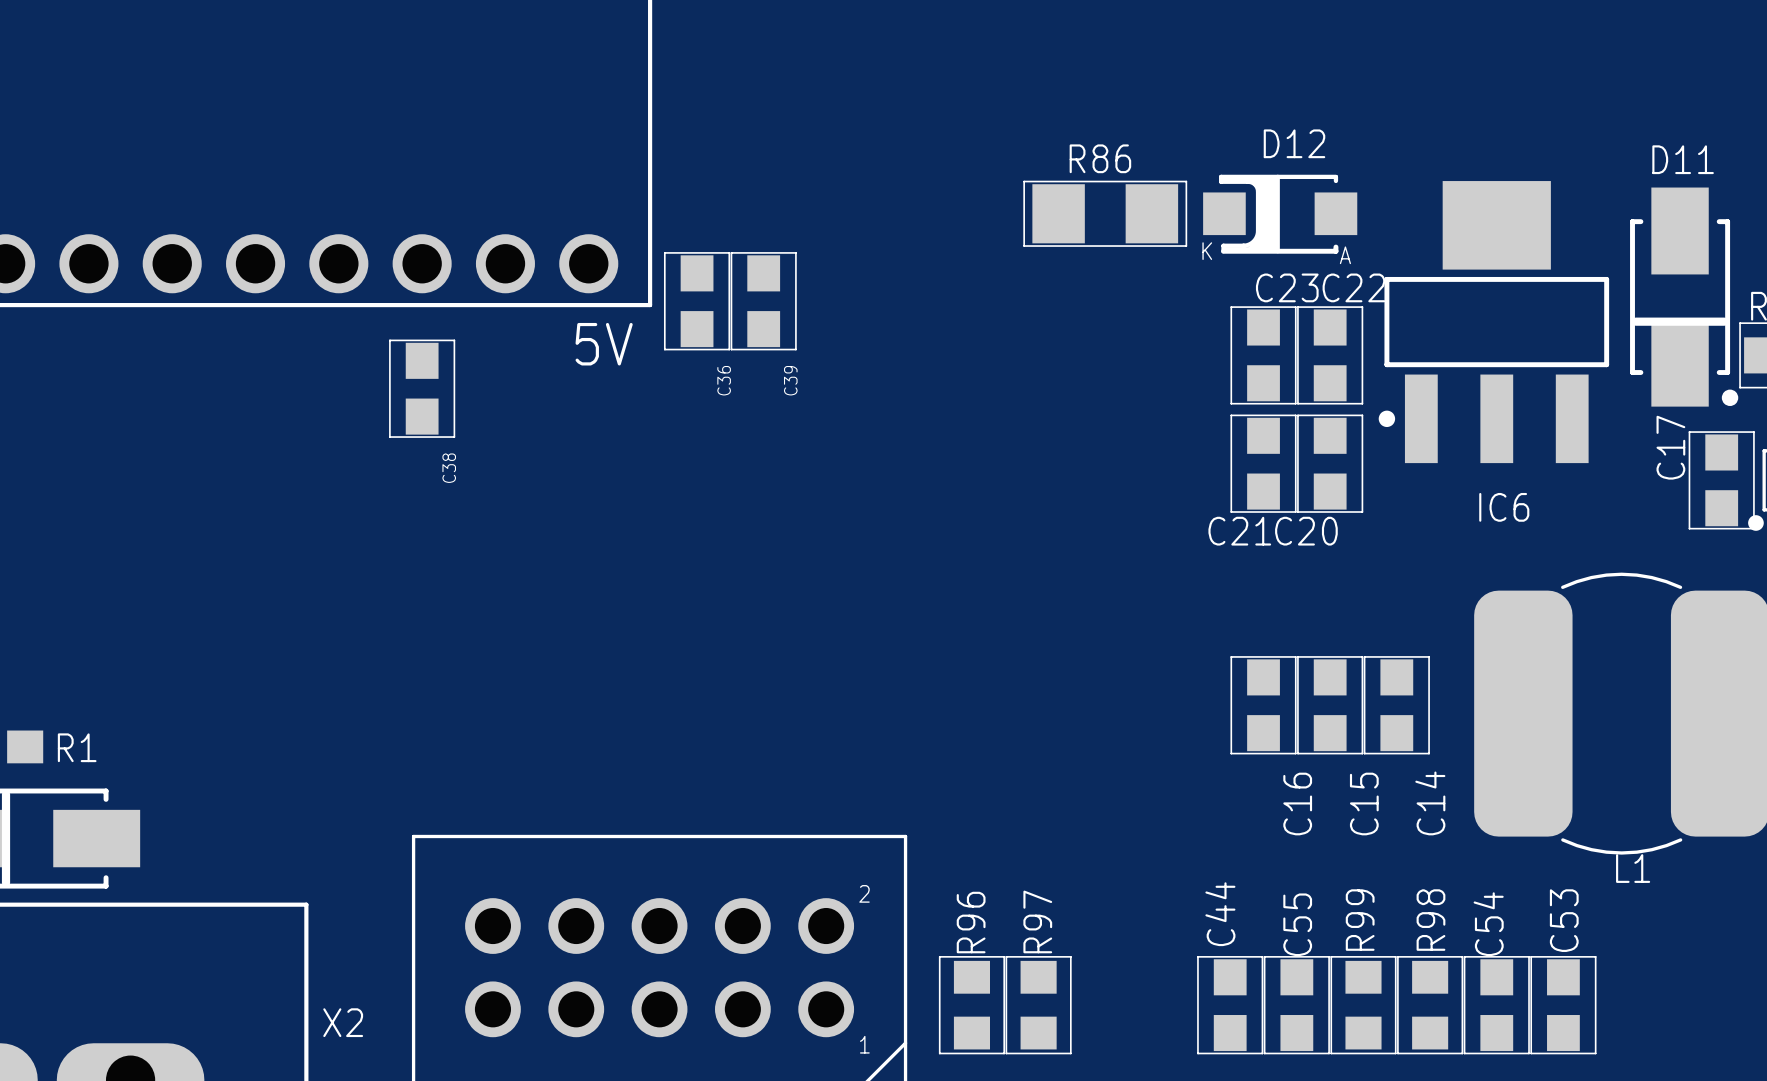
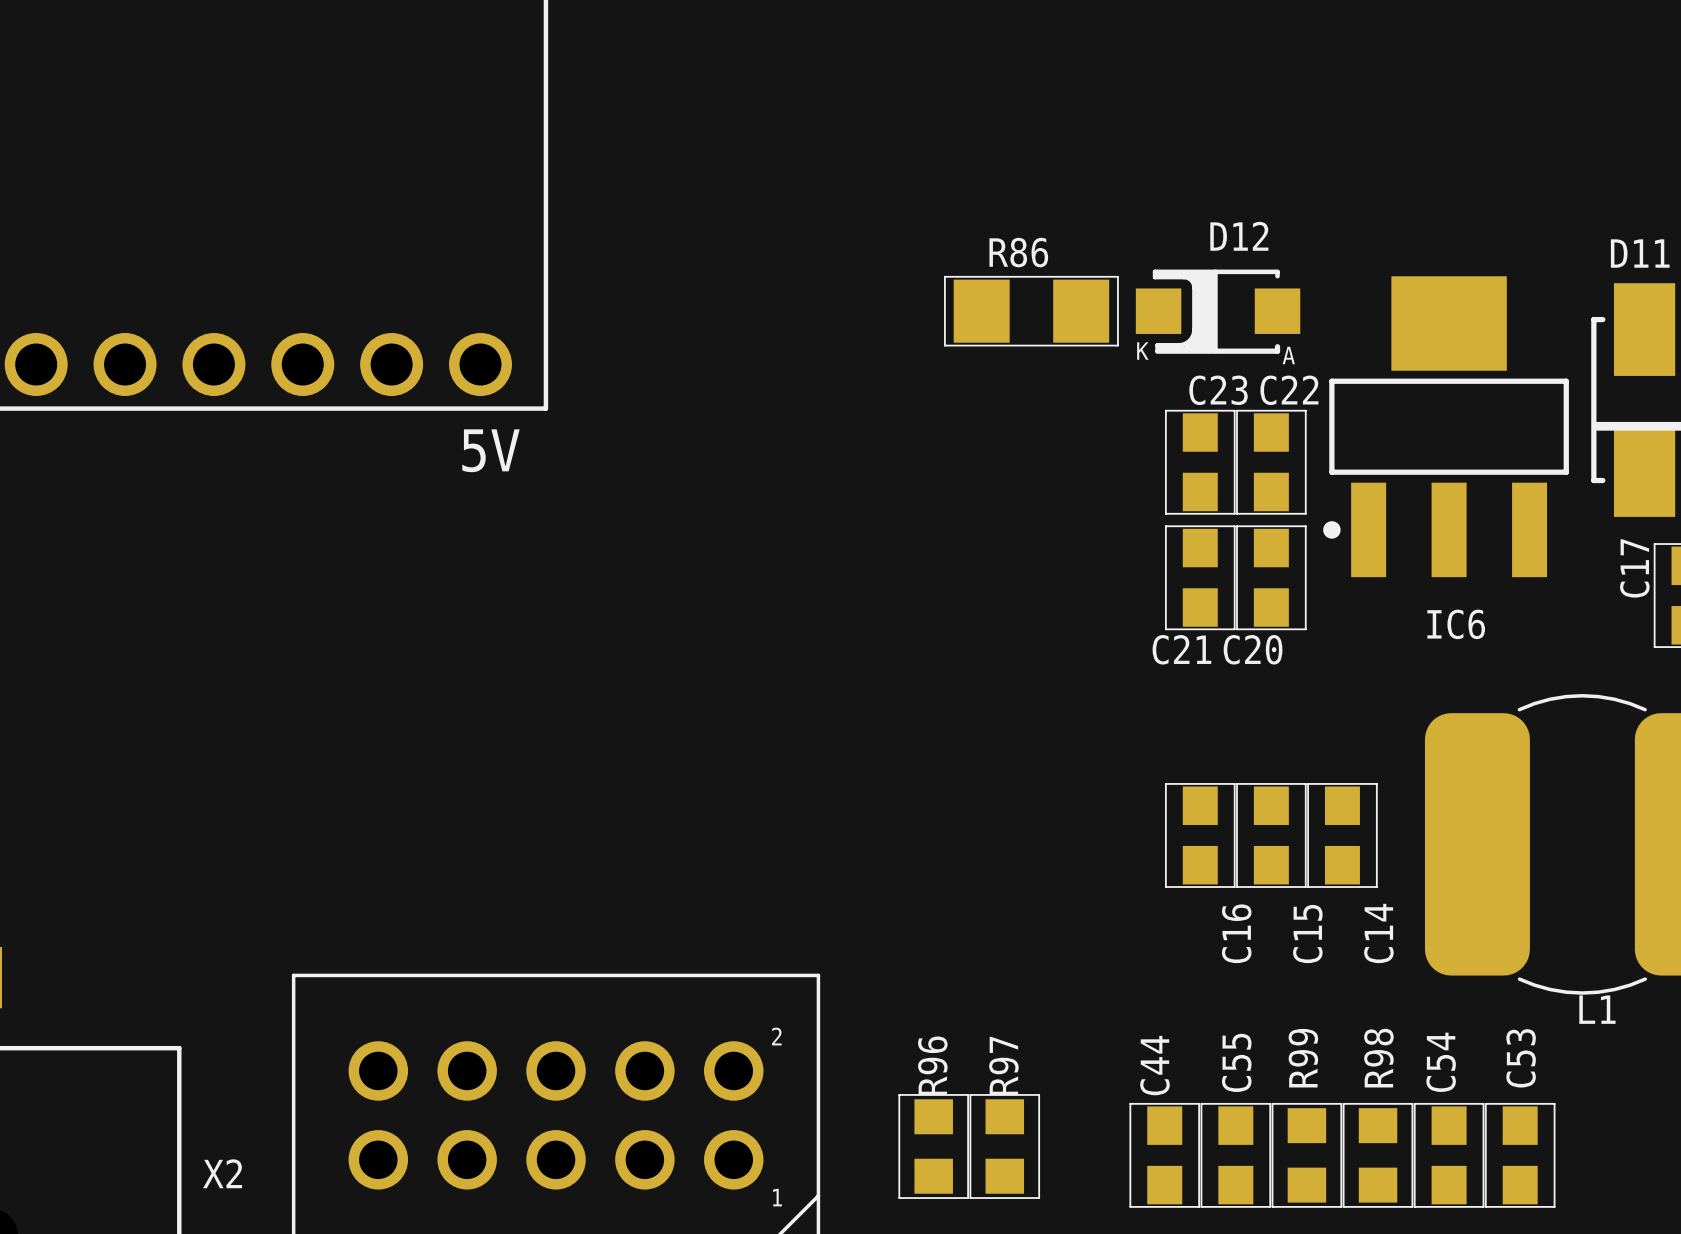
C36: (697, 301) -> none
C39: (763, 301) -> none
C38: (422, 388) -> none
R96 position: (971, 1005) -> (933, 1146)
R97 position: (1038, 1005) -> (1004, 1146)

